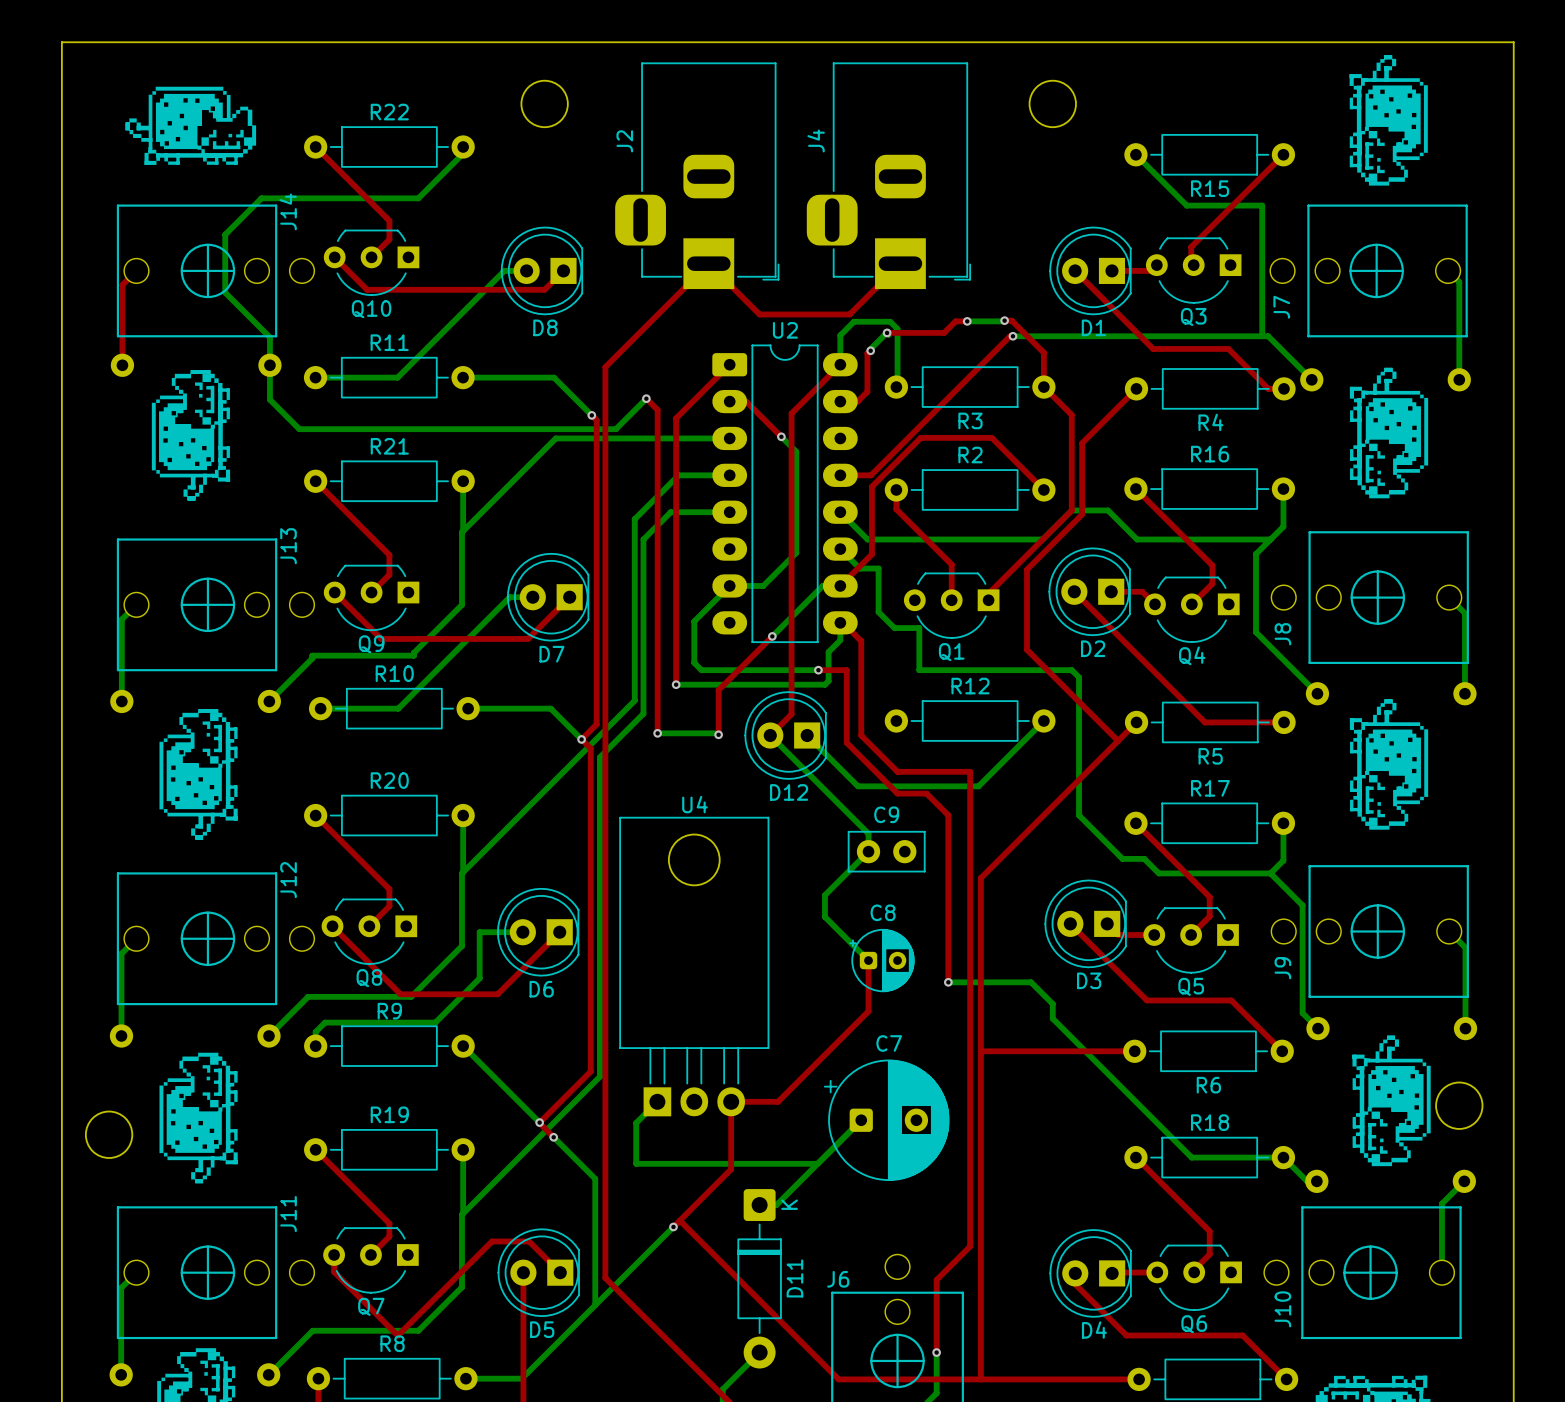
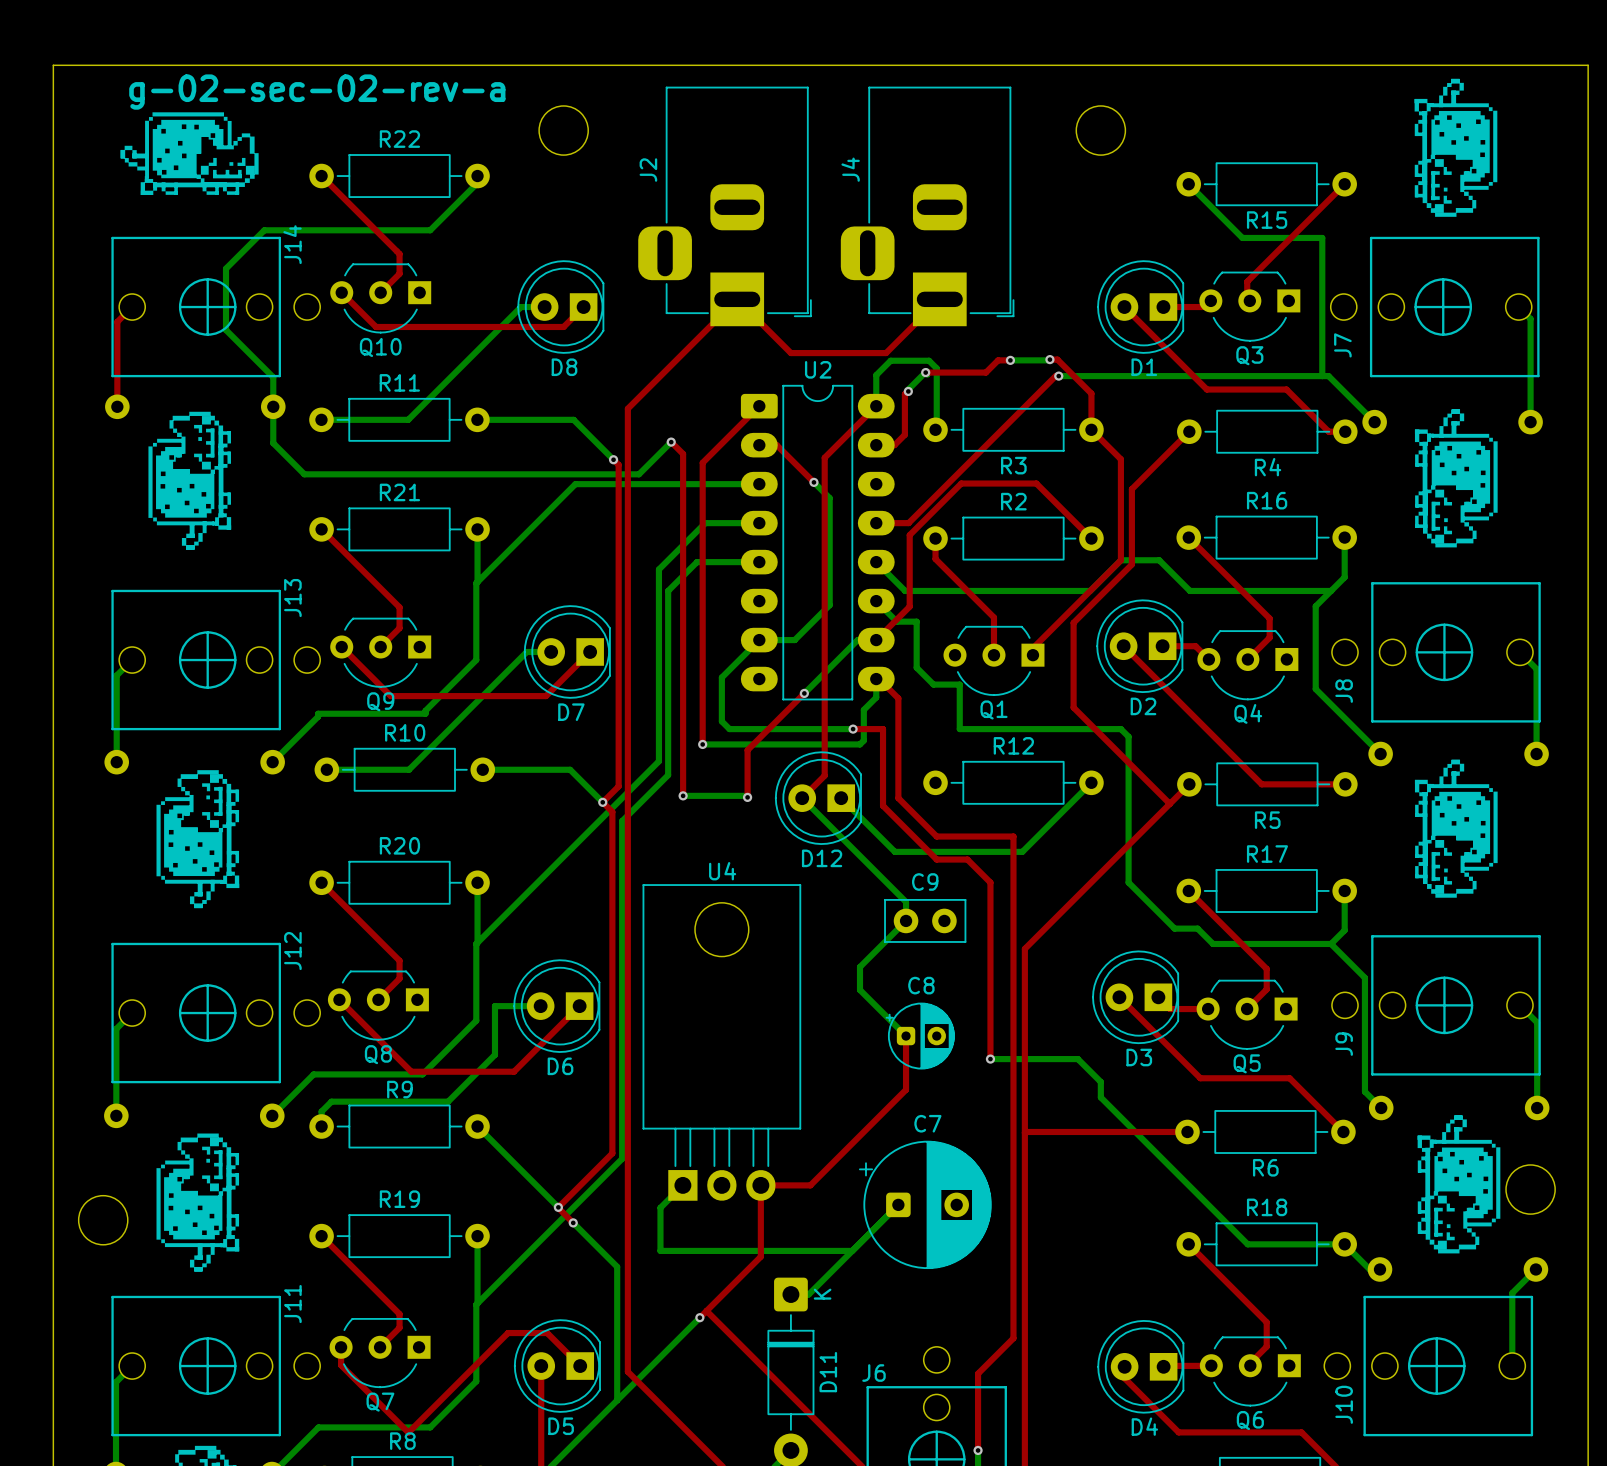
text: none -> g-02-sec-02-rev-a (317, 92)

